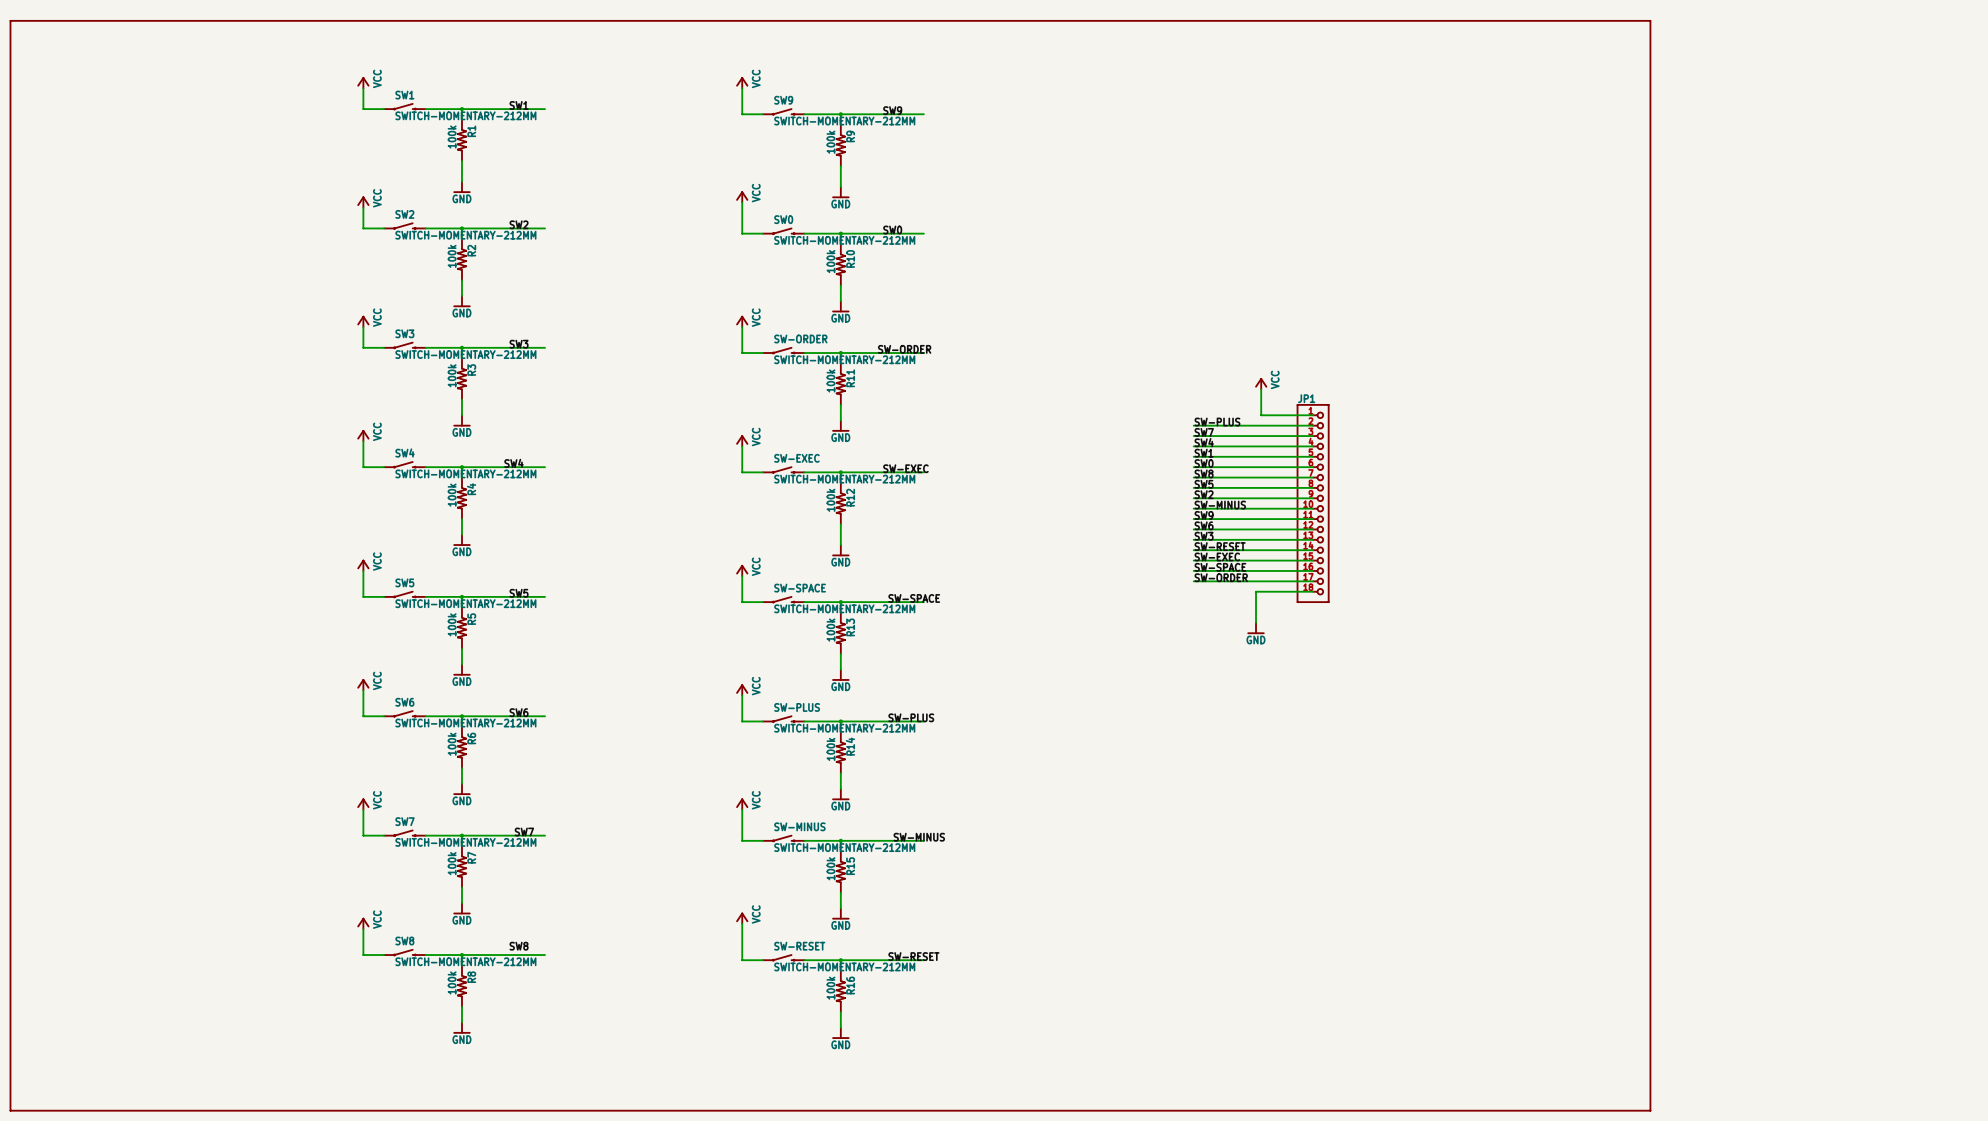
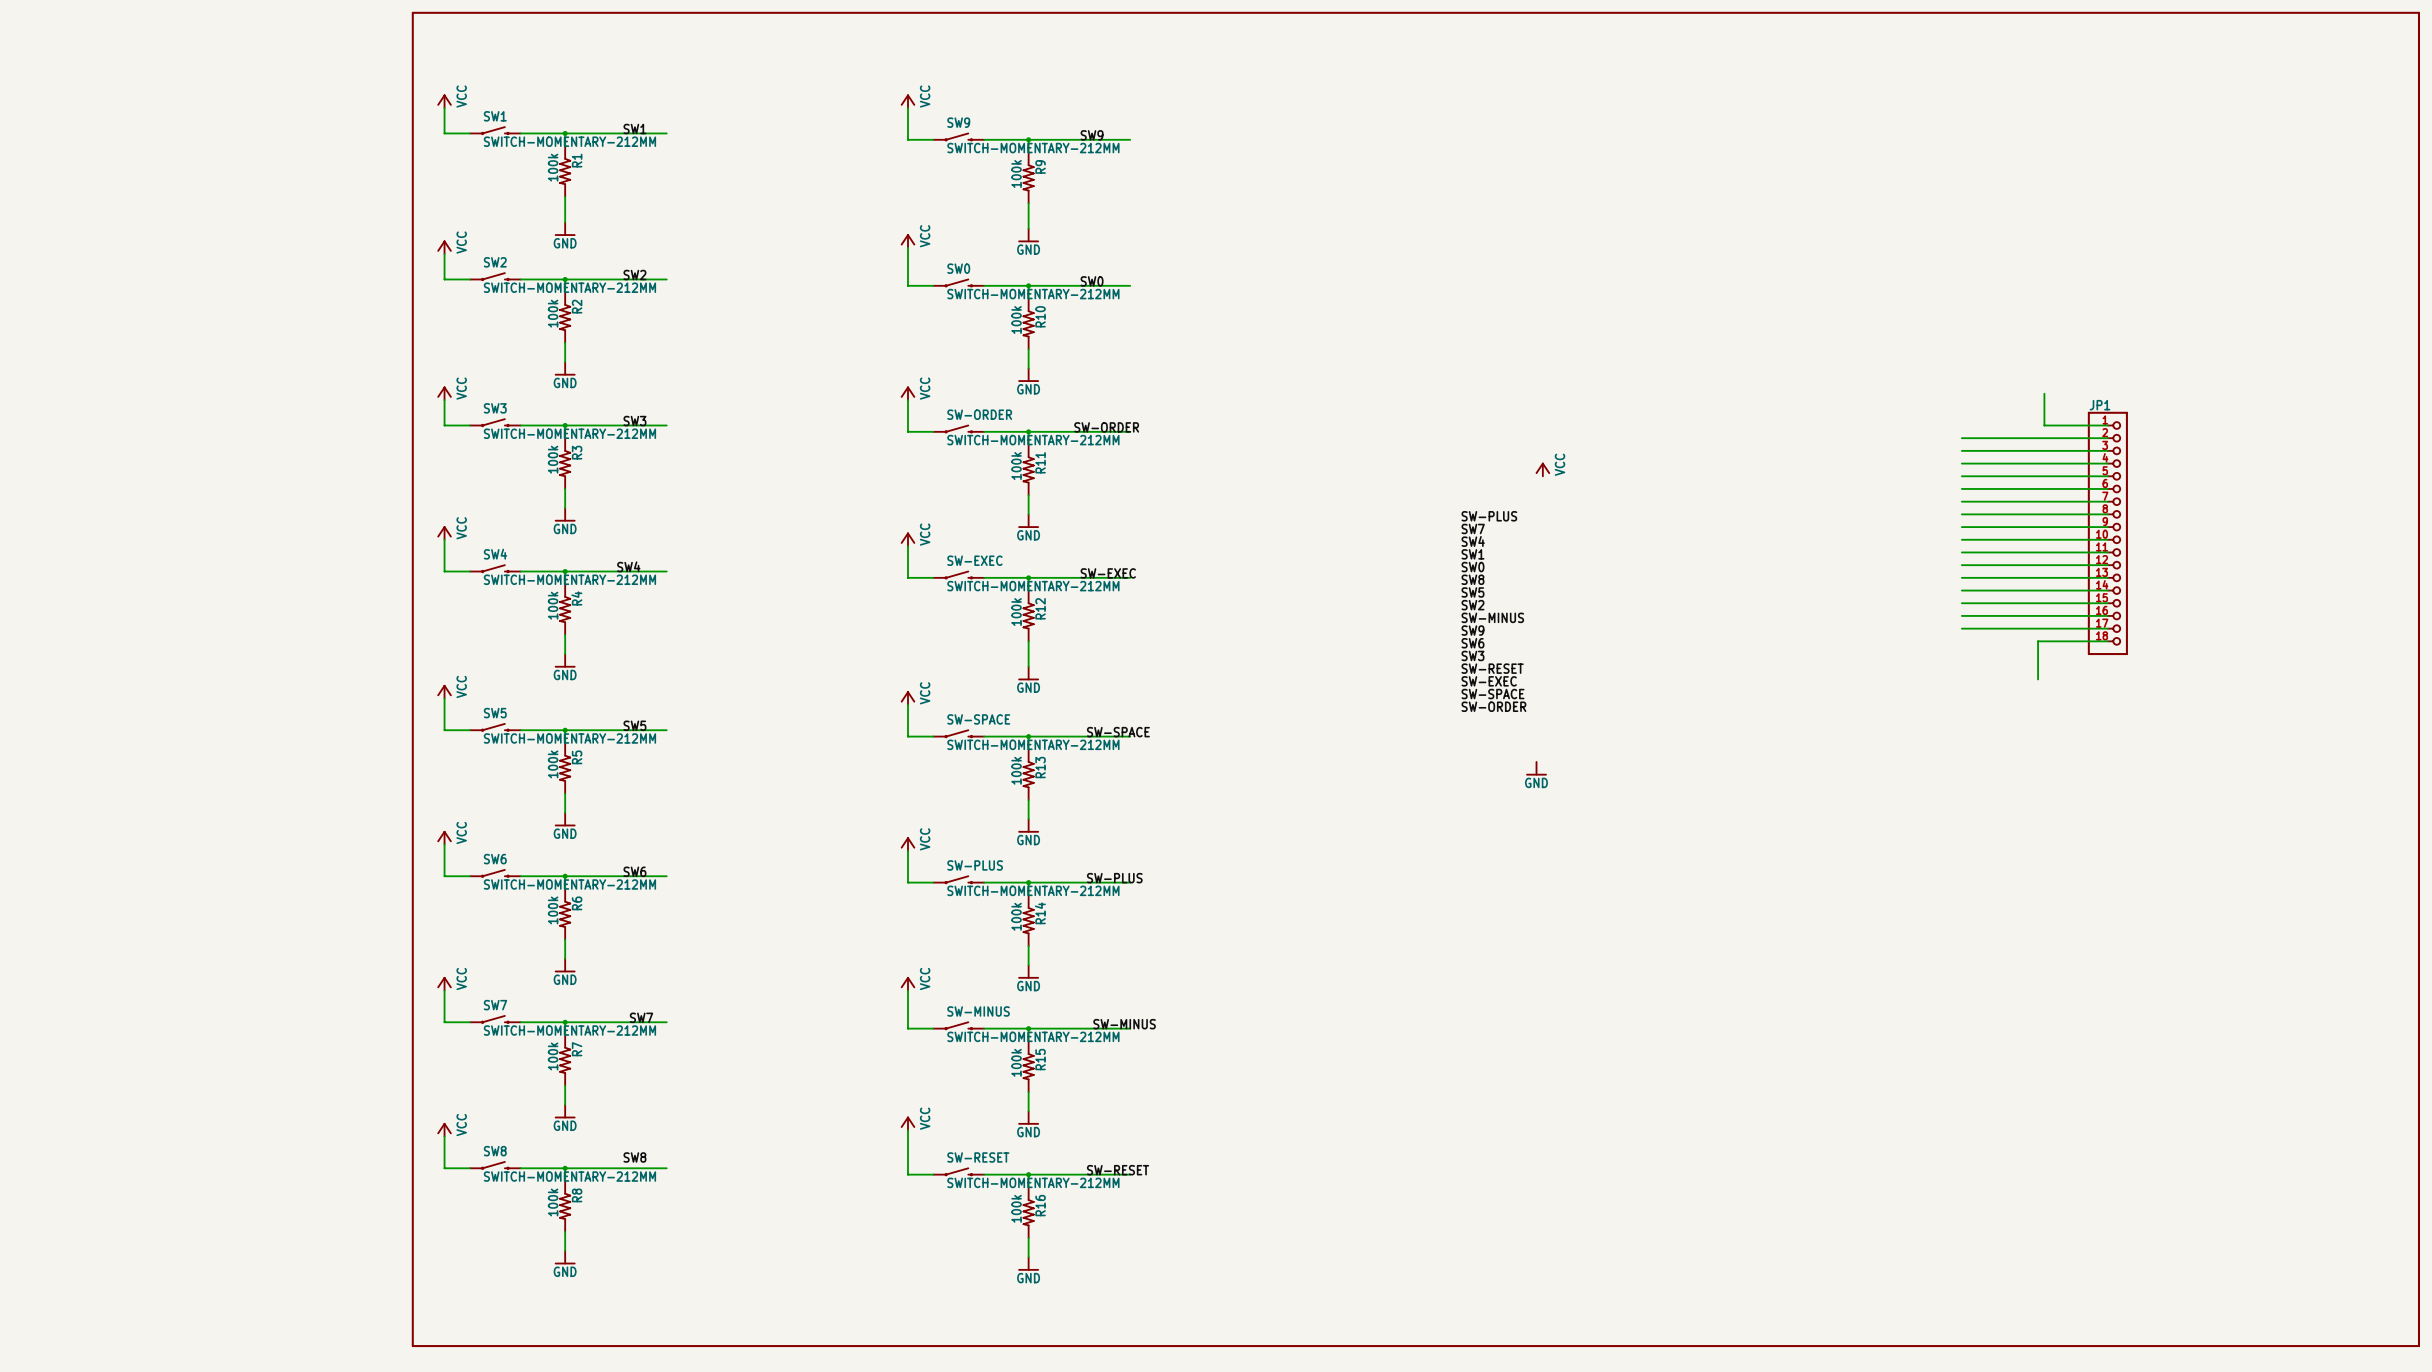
wire: none -> (2044, 393) (2044, 425) (2107, 425)
wire: none -> (1961, 438) (2107, 438)
wire: none -> (1961, 450) (2107, 450)
wire: none -> (1961, 463) (2107, 463)
wire: (1261, 389) (1261, 415) (1313, 415) -> none
wire: none -> (1961, 476) (2107, 476)
wire: none -> (1961, 488) (2107, 488)
wire: none -> (1961, 501) (2107, 501)
wire: none -> (1961, 514) (2107, 514)
wire: (1193, 425) (1313, 425) -> none
wire: none -> (1961, 527) (2107, 527)
wire: (1193, 436) (1313, 436) -> none
wire: none -> (1961, 539) (2107, 539)
wire: (1193, 446) (1313, 446) -> none
wire: none -> (1961, 552) (2107, 552)
wire: (1193, 456) (1313, 456) -> none
wire: none -> (1961, 565) (2107, 565)
wire: (1193, 467) (1313, 467) -> none
wire: none -> (1961, 577) (2107, 577)
wire: (1193, 477) (1313, 477) -> none
wire: none -> (1961, 590) (2107, 590)
wire: (1193, 487) (1313, 487) -> none
wire: none -> (1961, 603) (2107, 603)
wire: (1193, 498) (1313, 498) -> none
JP1 position: (1313, 503) -> (2107, 533)
wire: none -> (1961, 615) (2107, 615)
wire: (1193, 508) (1313, 508) -> none
wire: none -> (1961, 628) (2107, 628)
wire: (1193, 519) (1313, 519) -> none
wire: none -> (2107, 641) (2038, 641) (2038, 679)
wire: (1193, 529) (1313, 529) -> none
wire: (1193, 539) (1313, 539) -> none
wire: (1193, 550) (1313, 550) -> none
part: none -> (1415, 679)
wire: (1193, 560) (1313, 560) -> none
part: (830, 565) -> none
wire: (1193, 570) (1313, 570) -> none
wire: (1193, 581) (1313, 581) -> none
wire: (1313, 591) (1256, 591) (1256, 622) -> none

